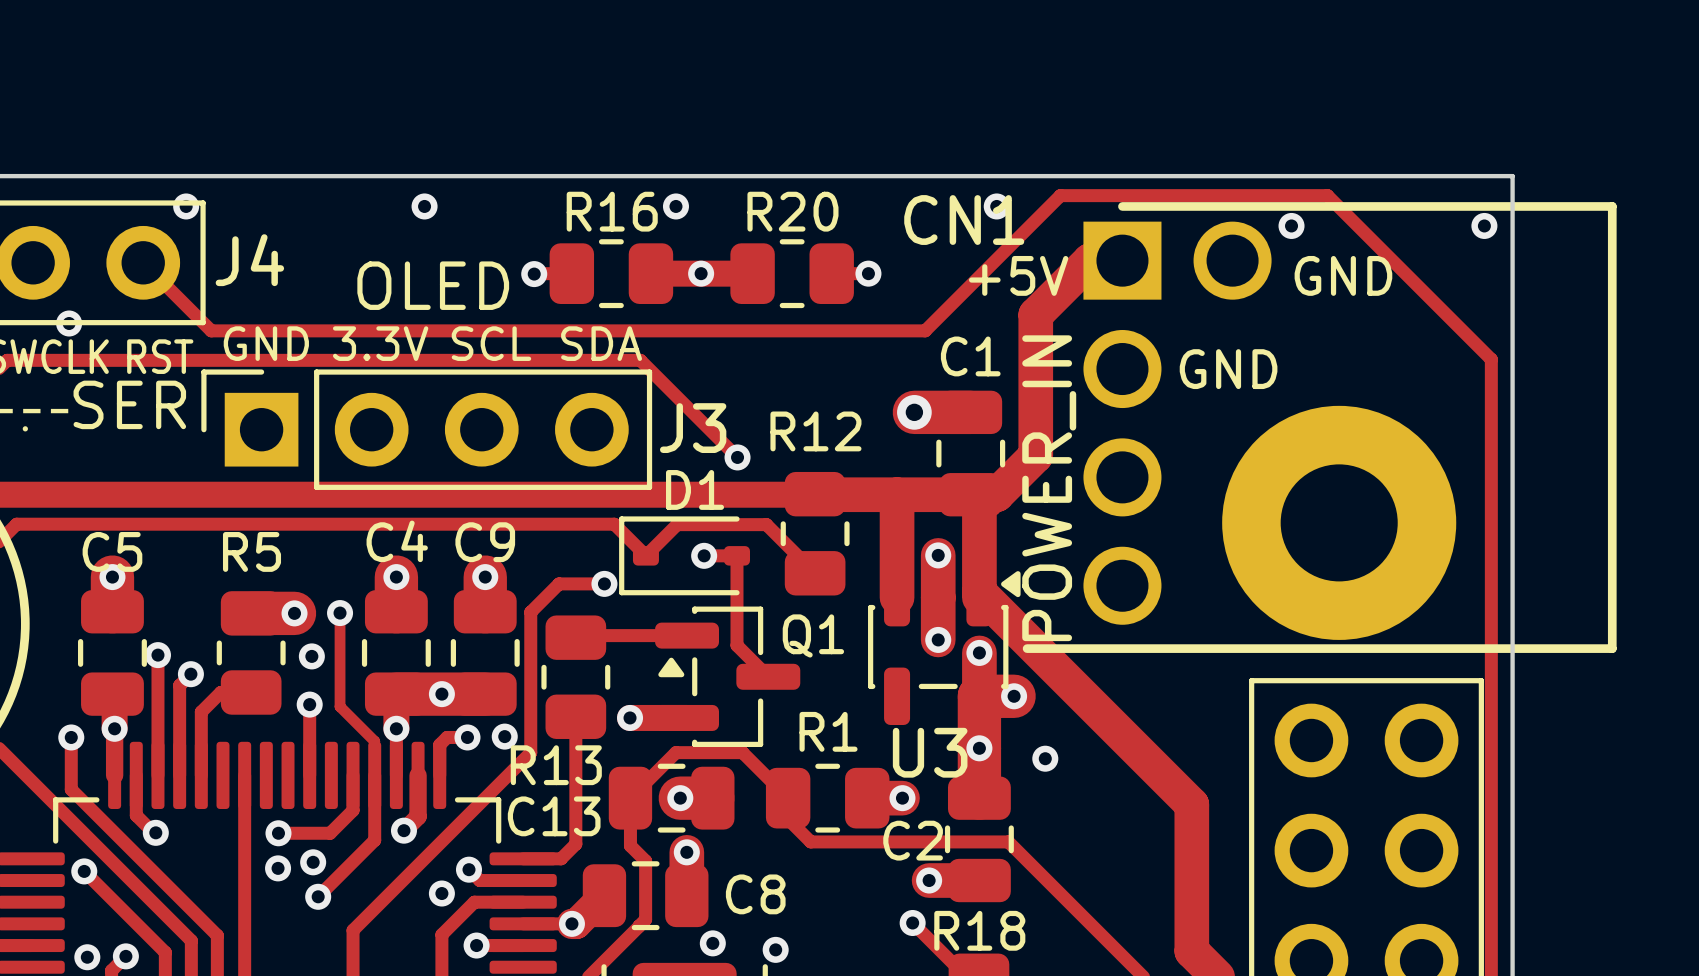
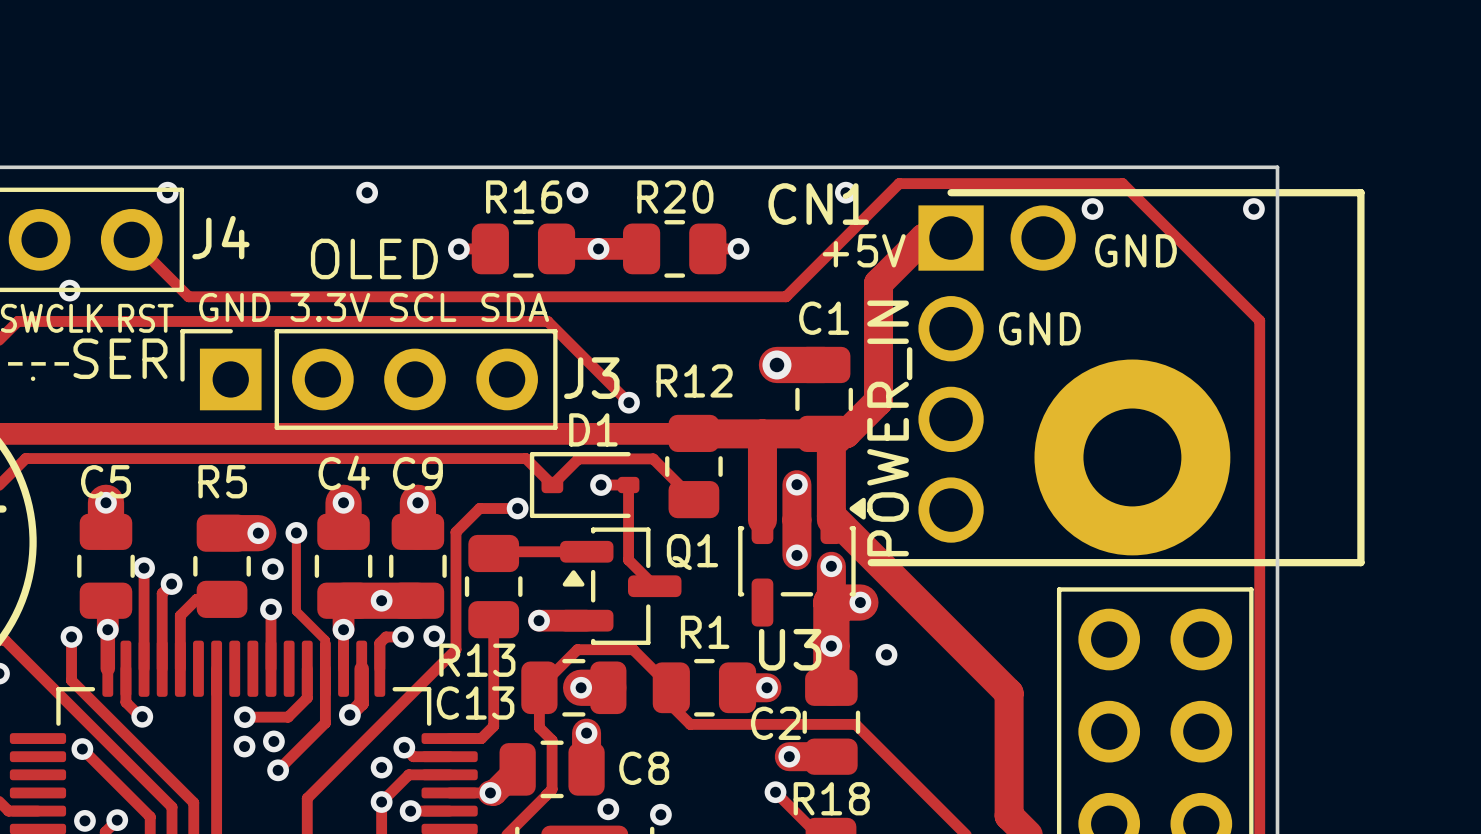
via: none -> (381, 802)

